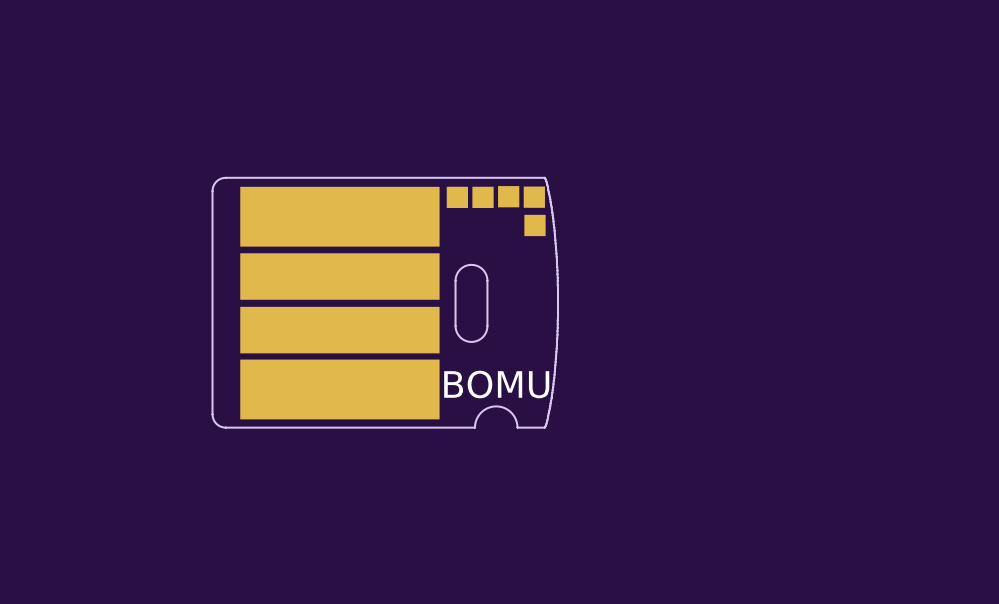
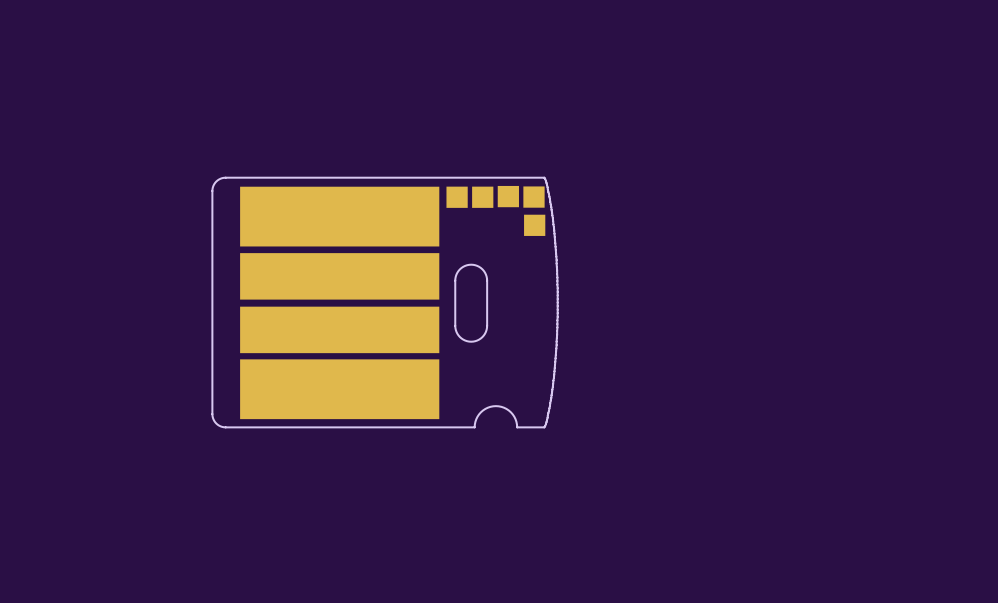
text: BOMU (496, 384) -> none

